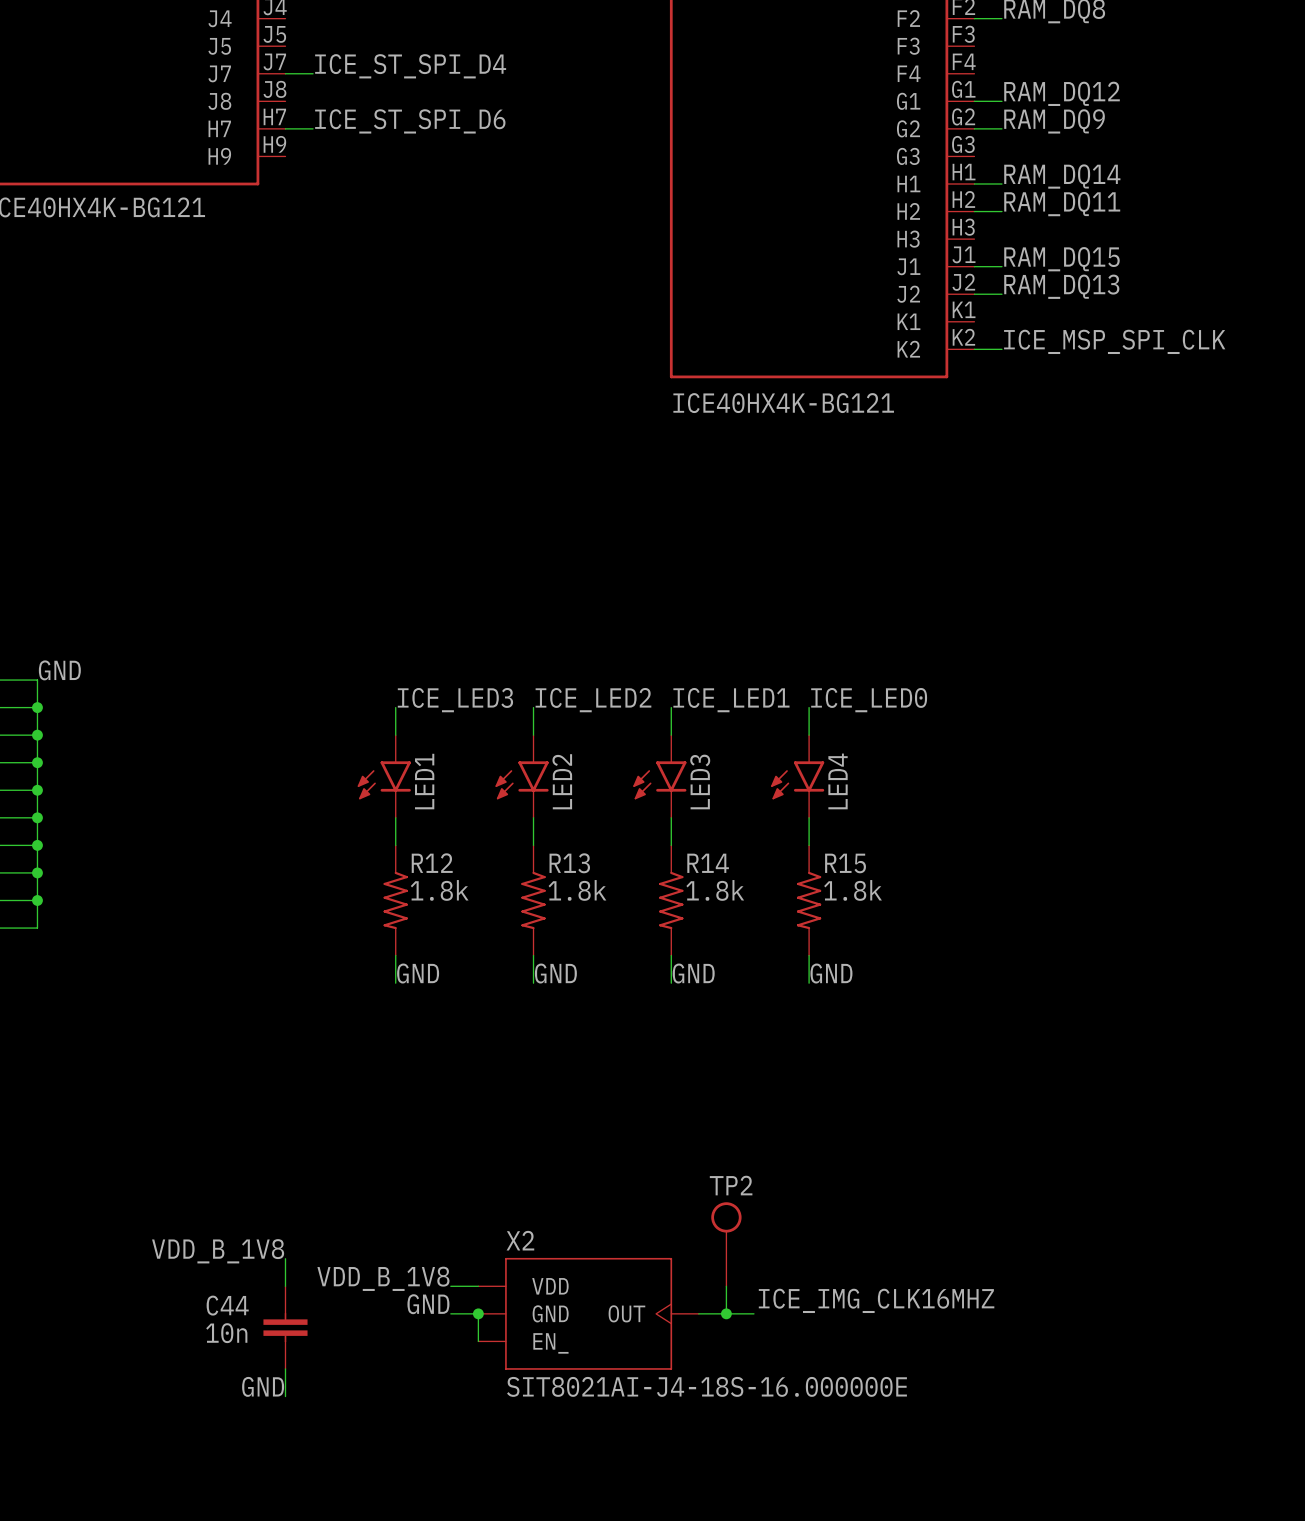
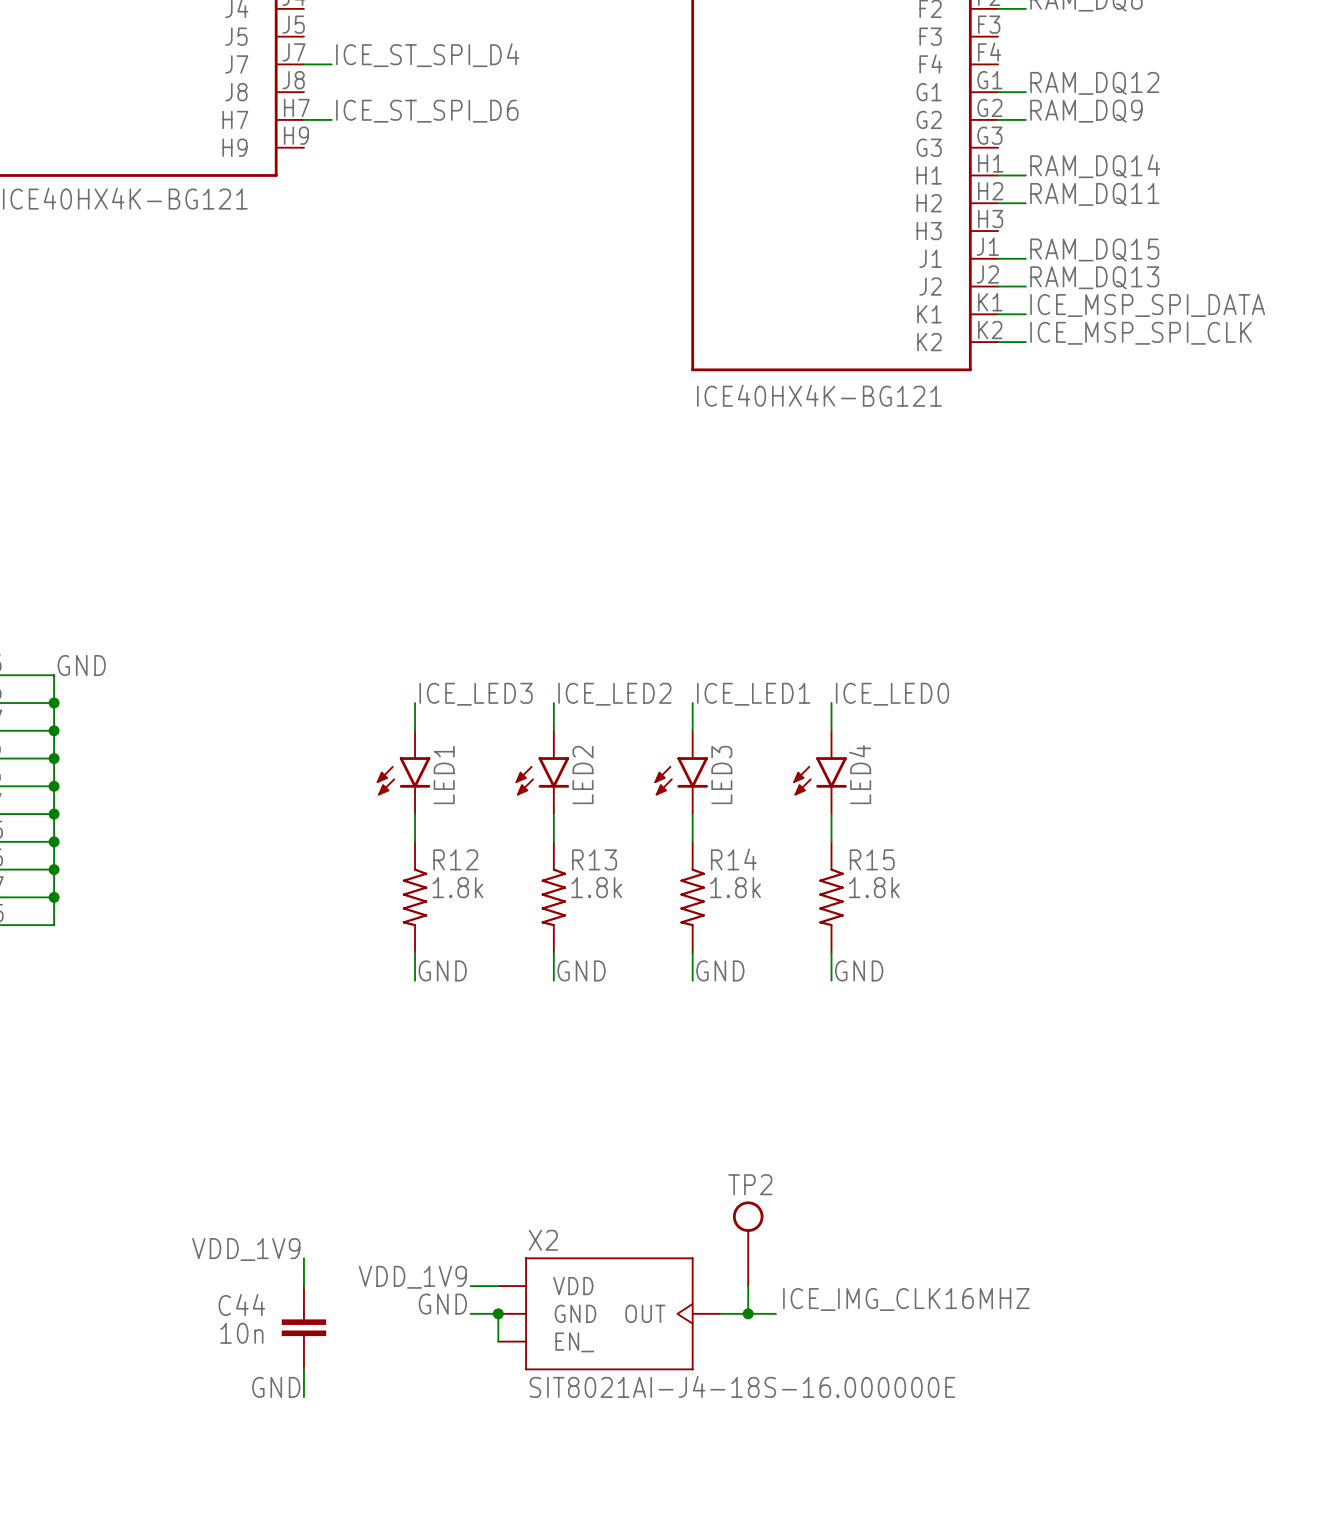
label: none -> ICE_MSP_SPI_DATA (1147, 305)
wire: none -> (998, 314) (1025, 314)
label: VDD_B_1V8 (218, 1251) -> VDD_1V9 (246, 1249)
label: VDD_B_1V8 (383, 1278) -> VDD_1V9 (412, 1277)

